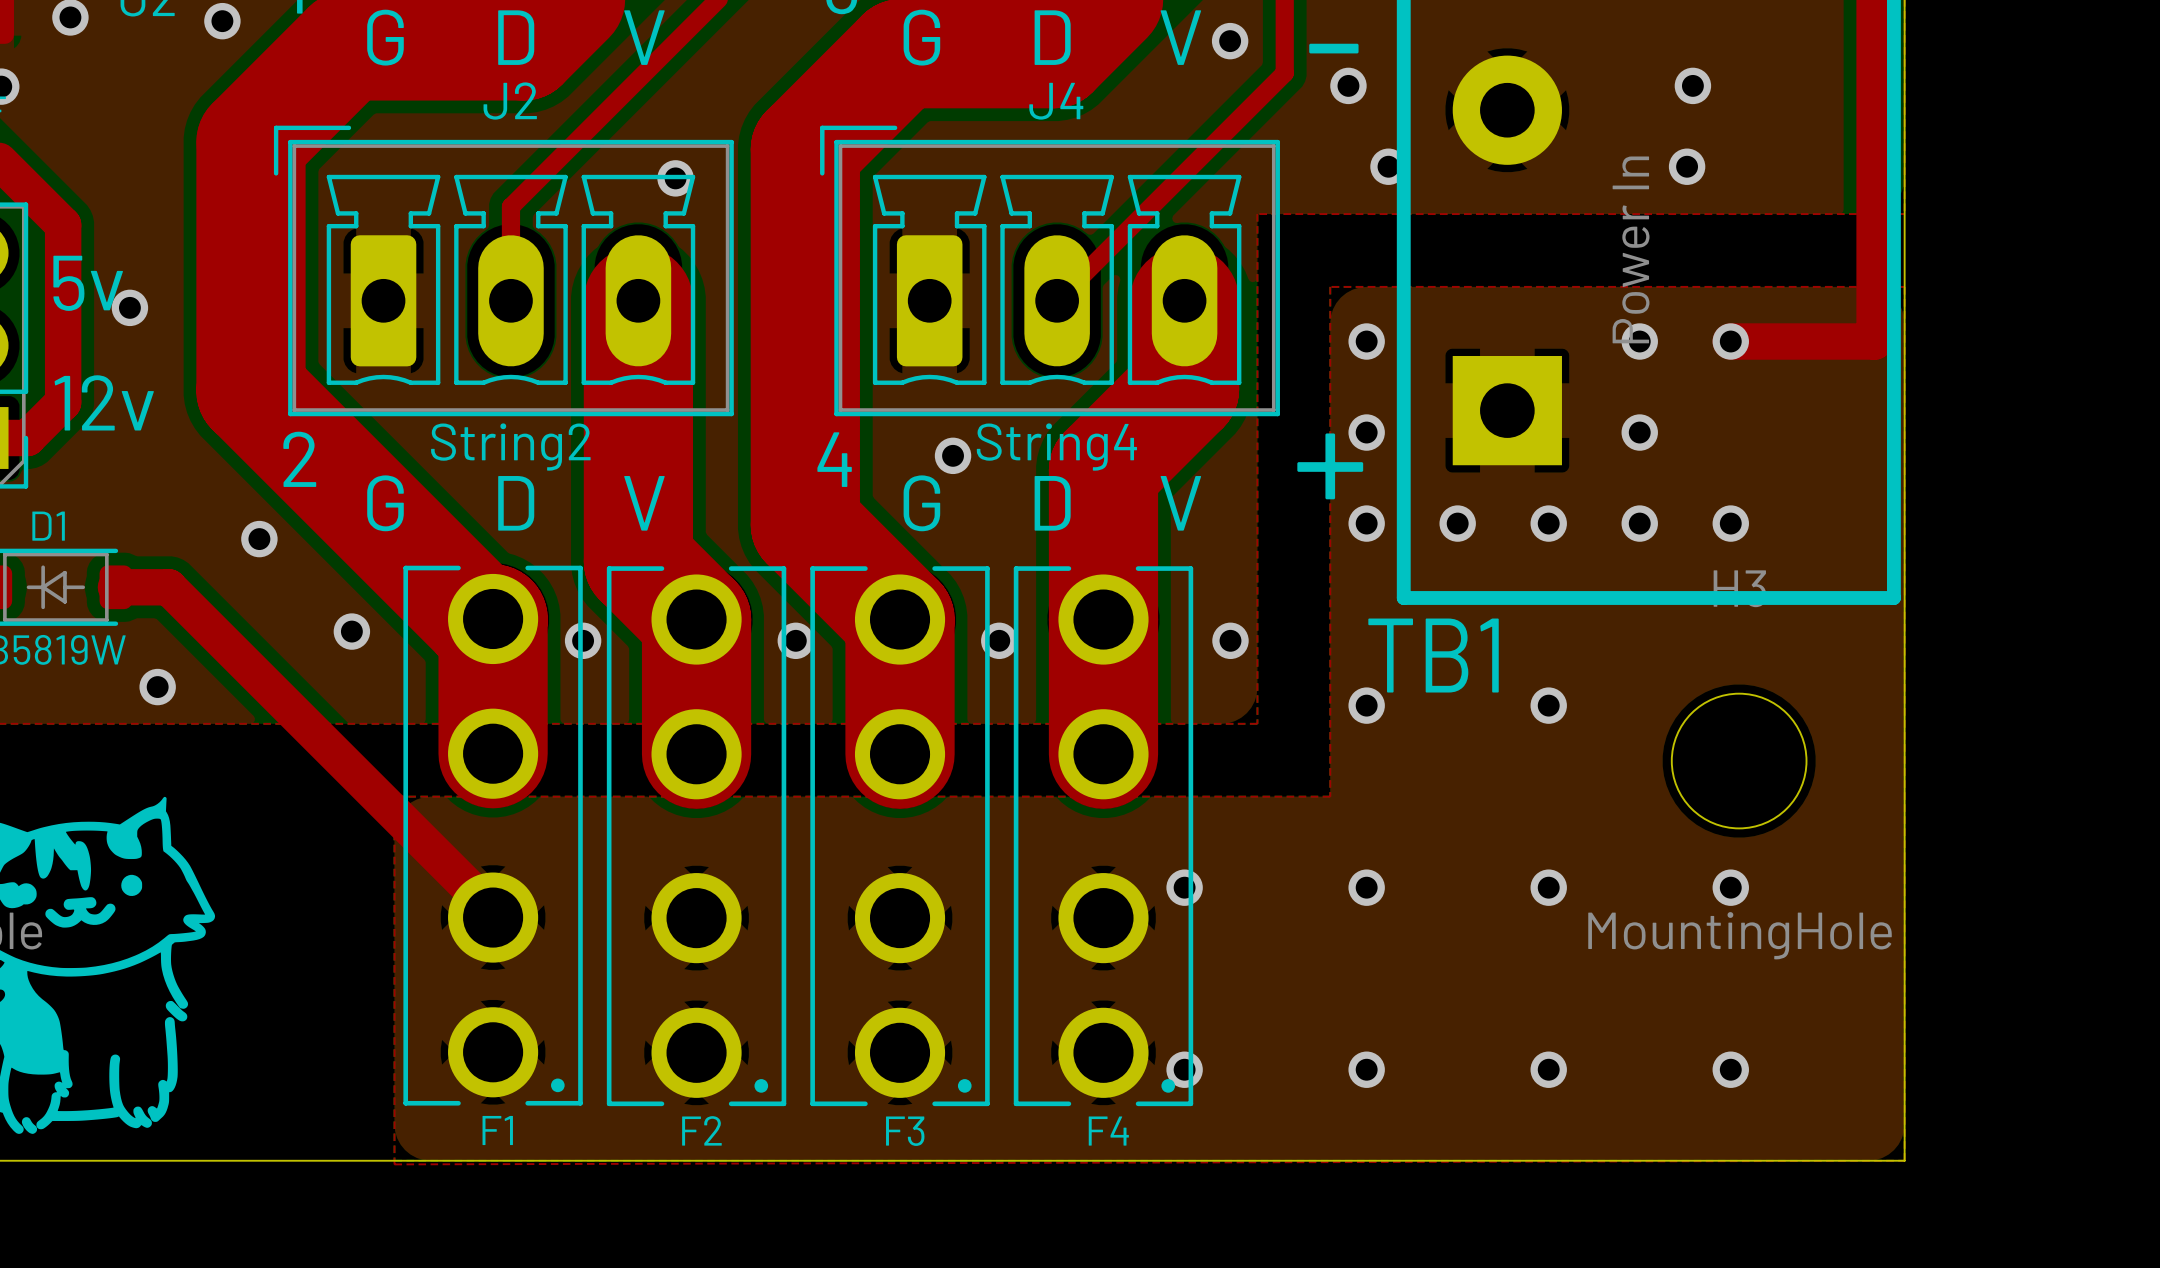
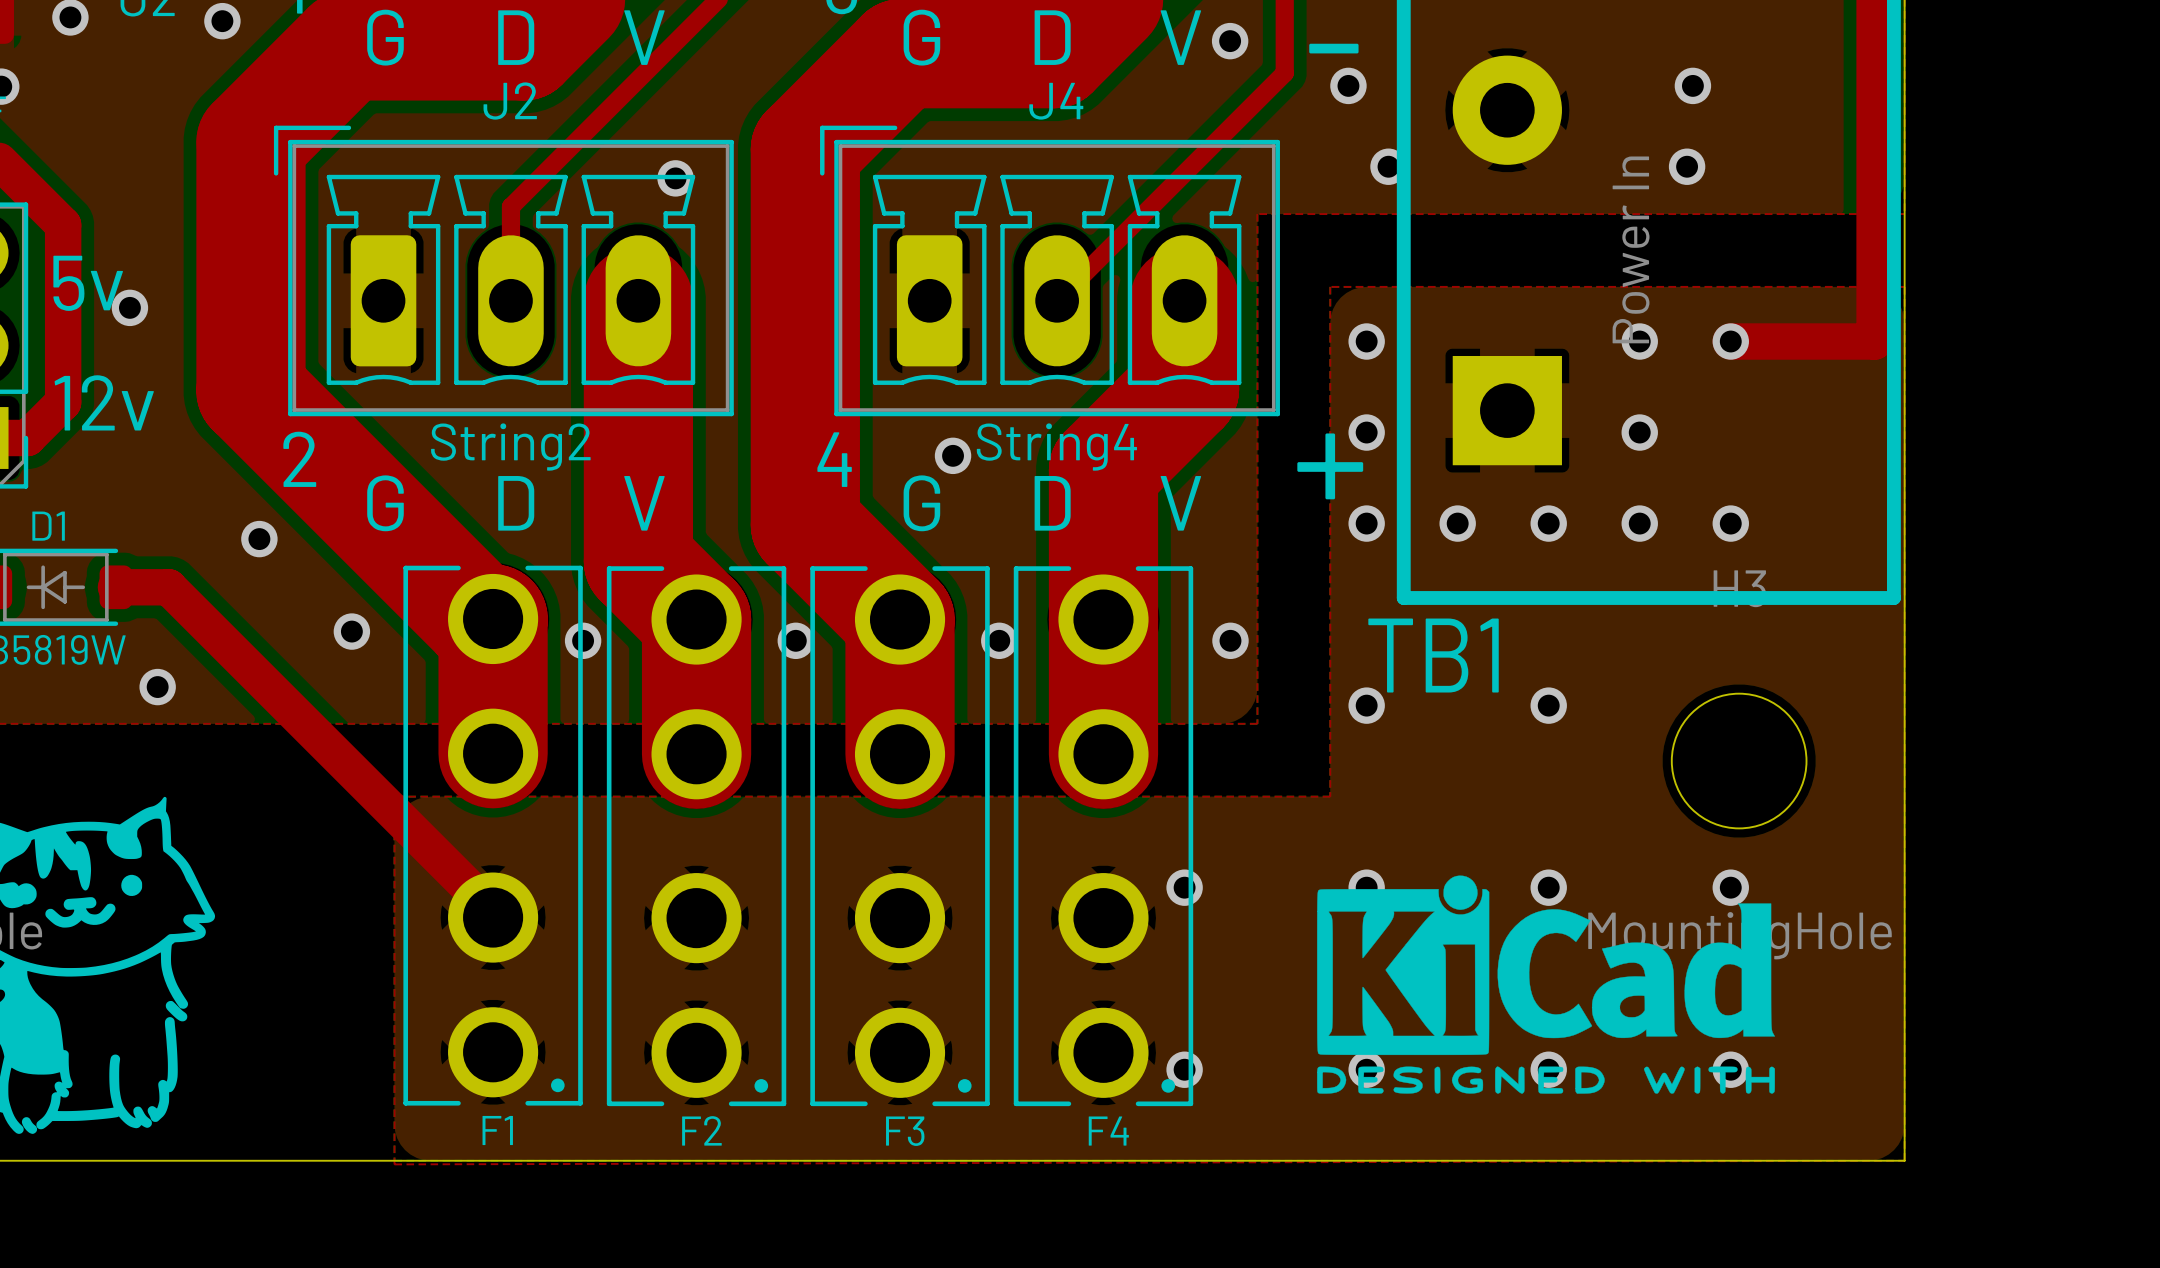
drawing: none -> [1317, 875, 1775, 1094]

